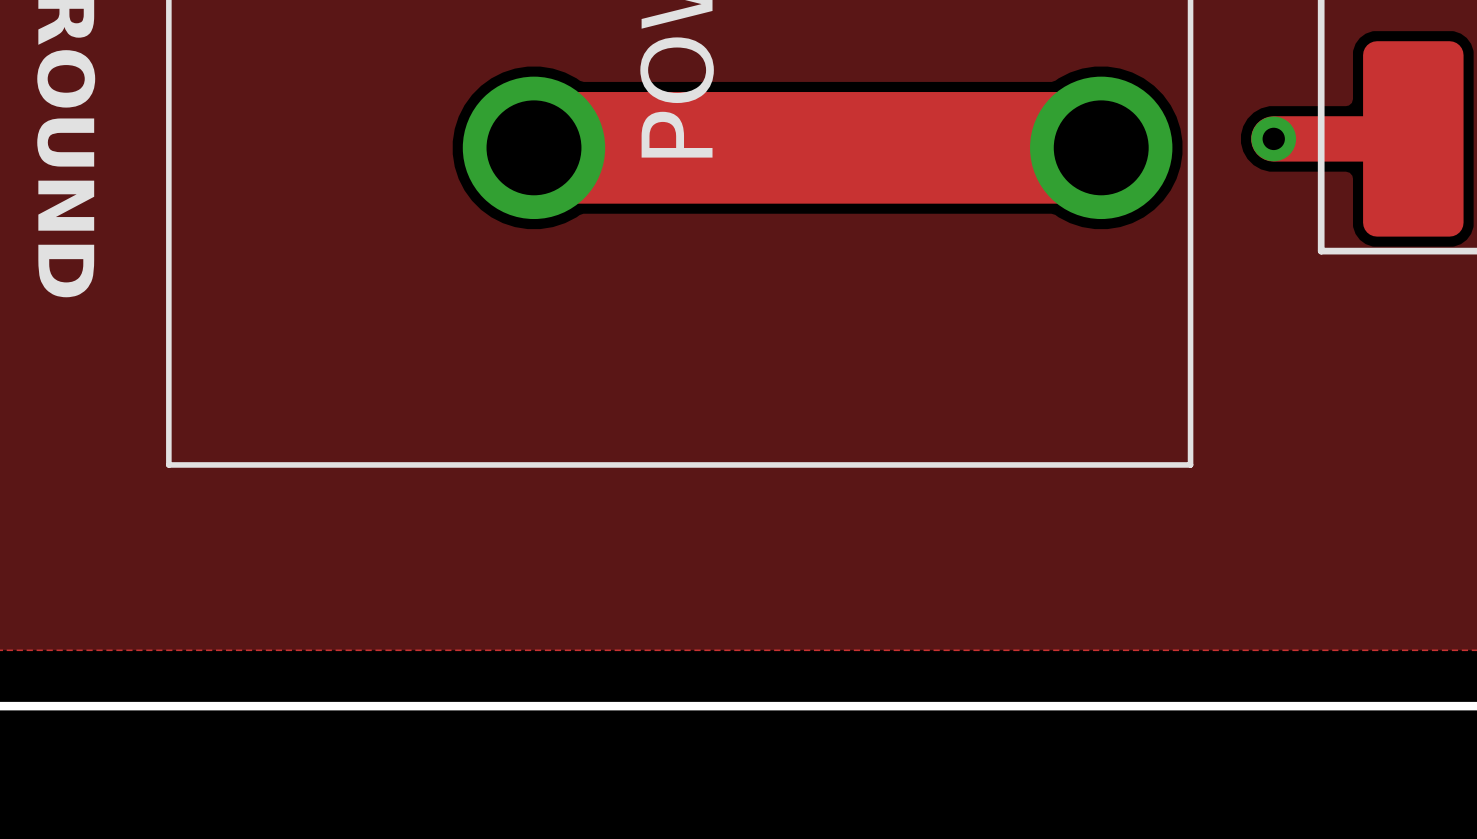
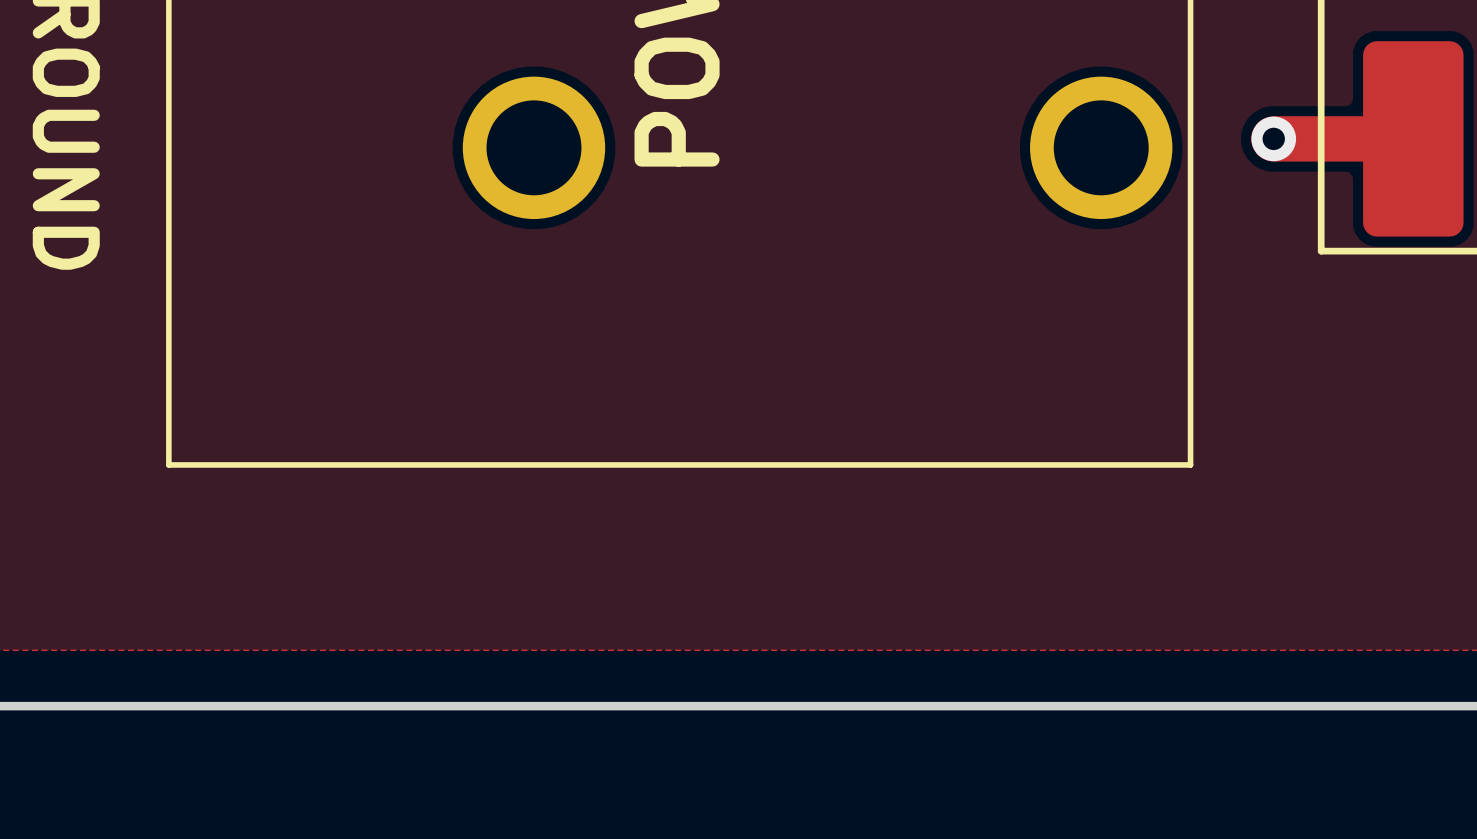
track: (533, 147) (1101, 147) -> none

